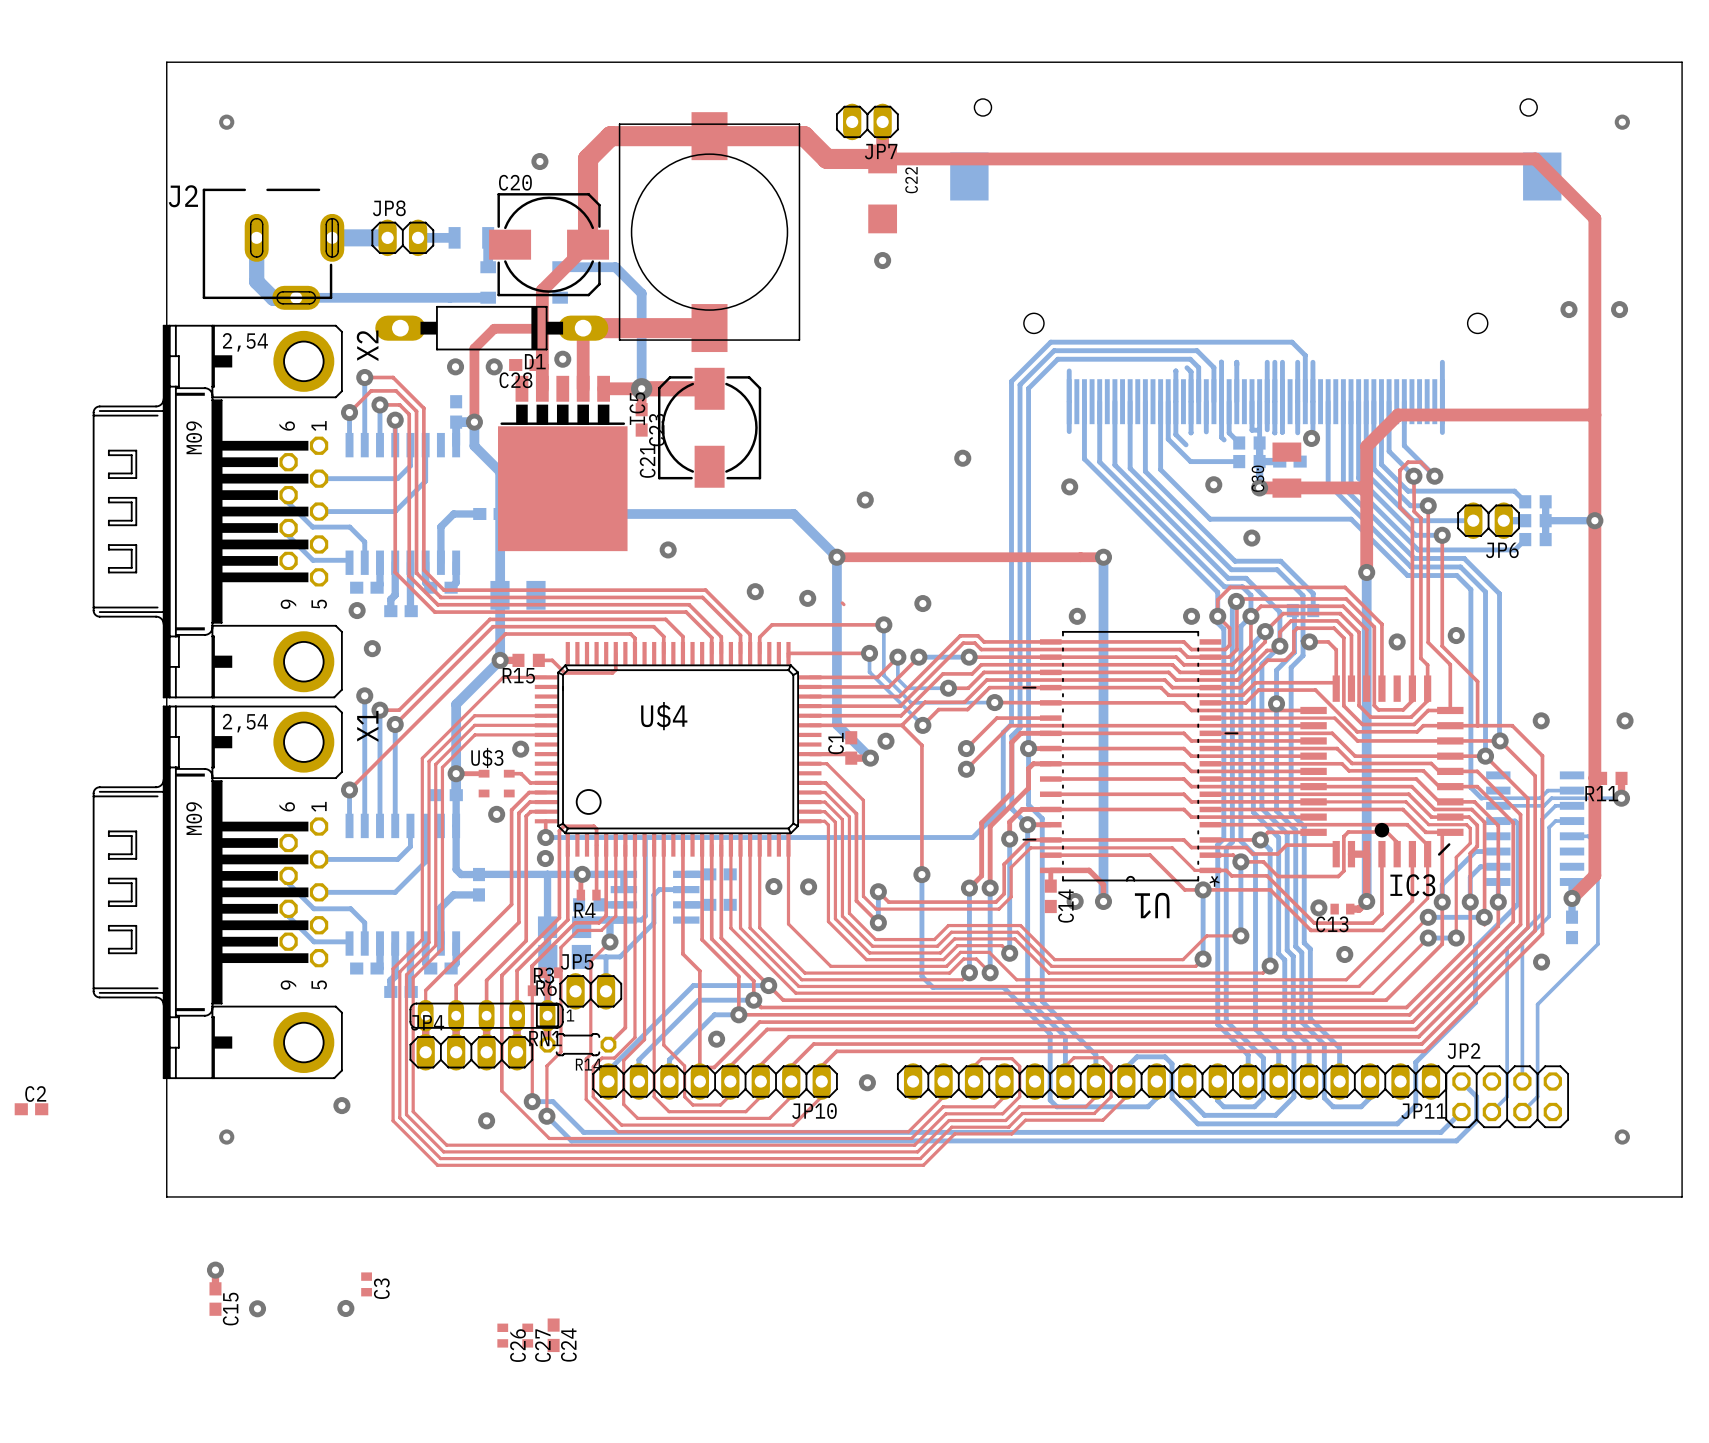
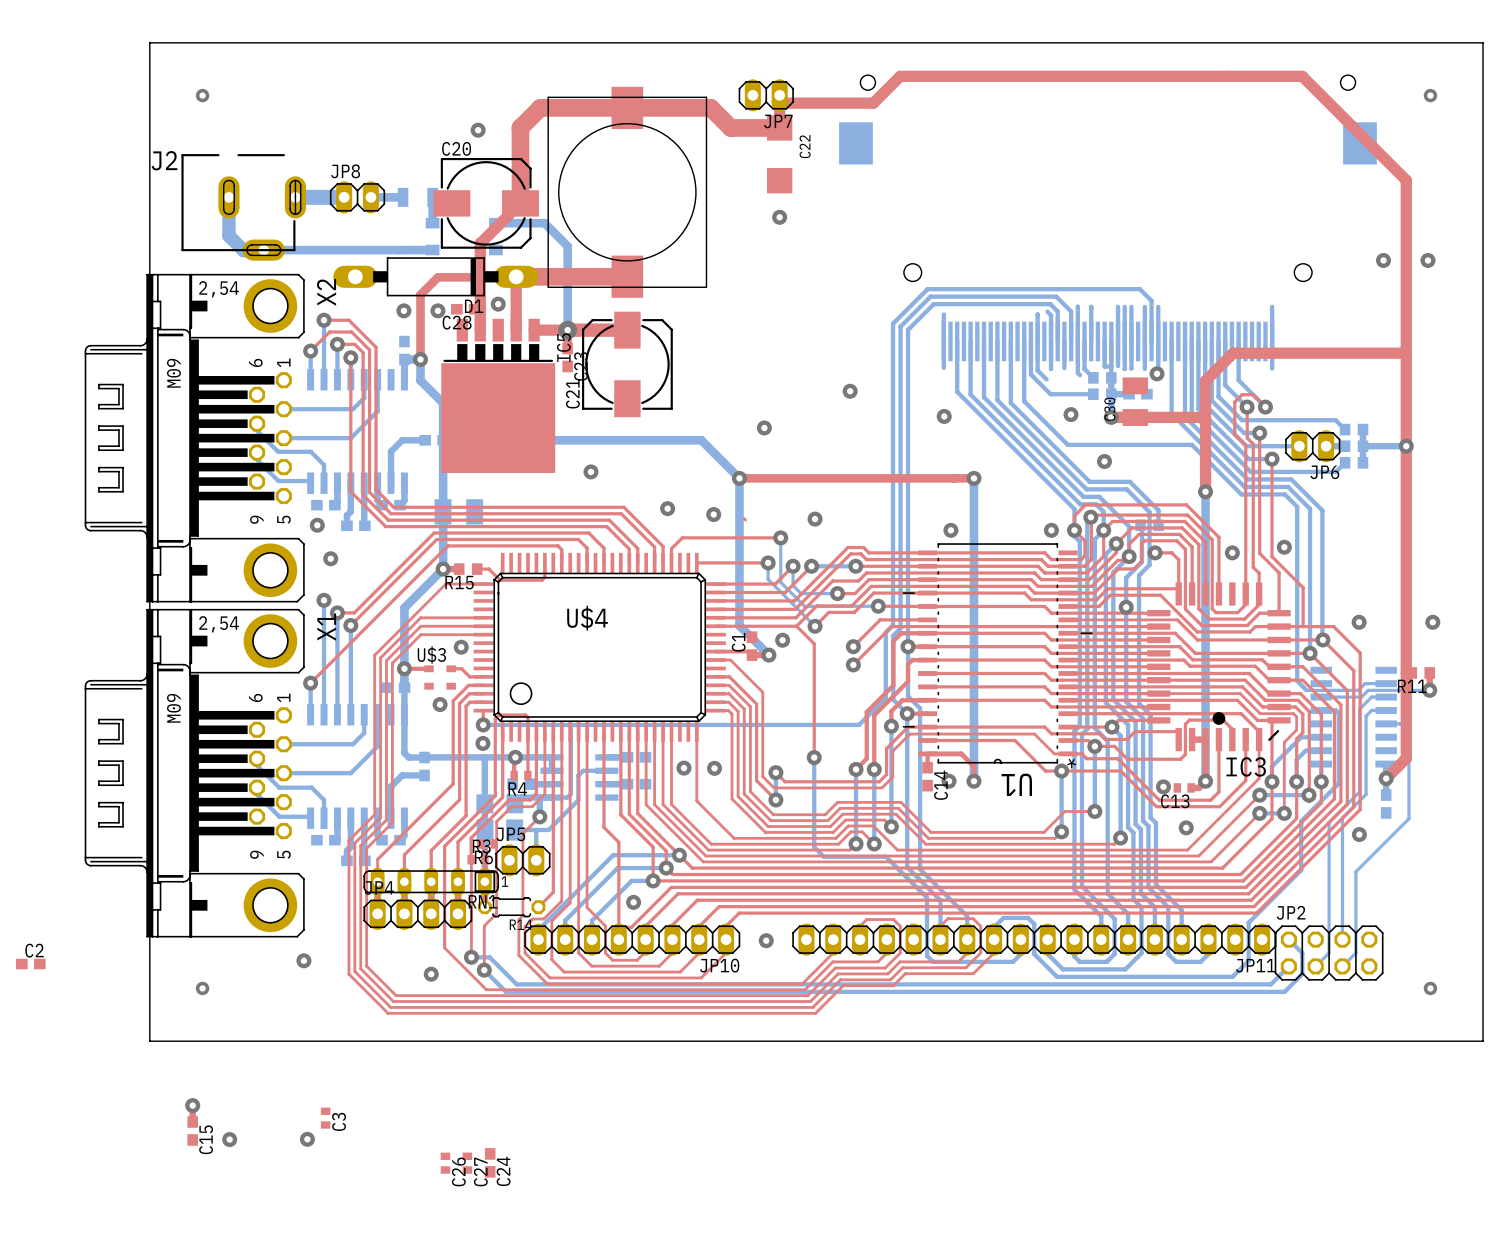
top track: (882, 158) (1535, 158) -> (779, 103) (873, 103) (900, 76) (1302, 76) (1353, 127)

